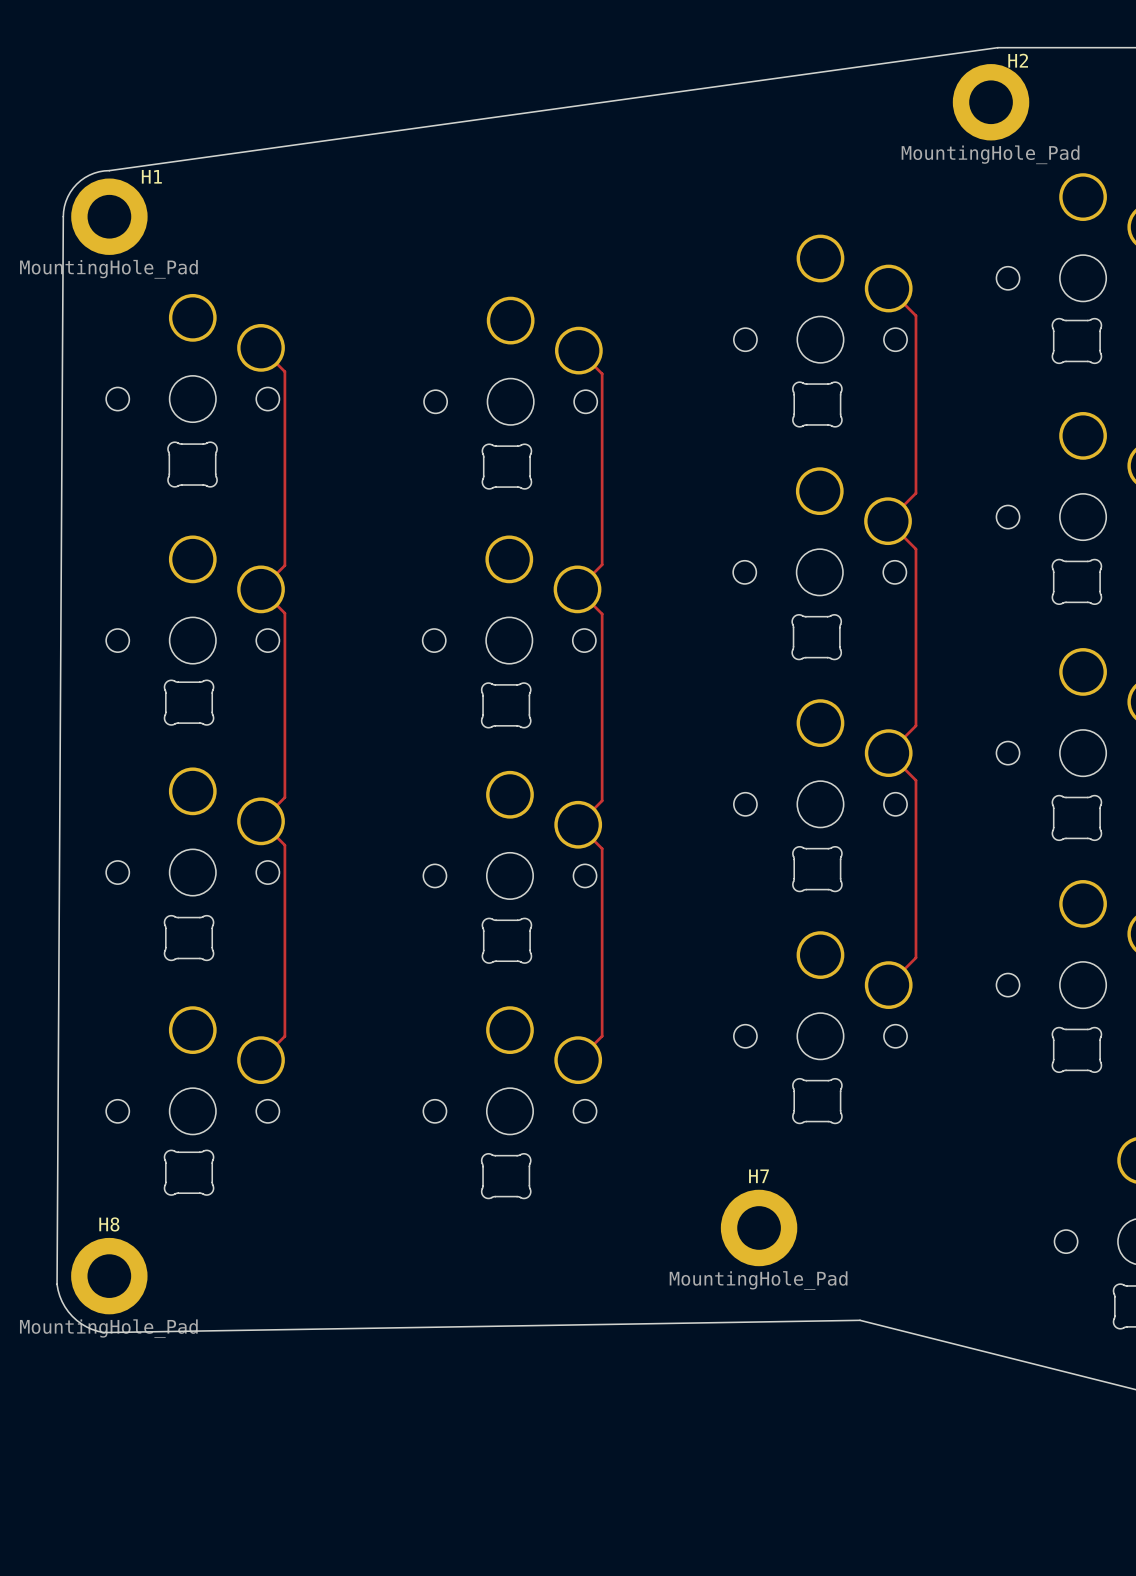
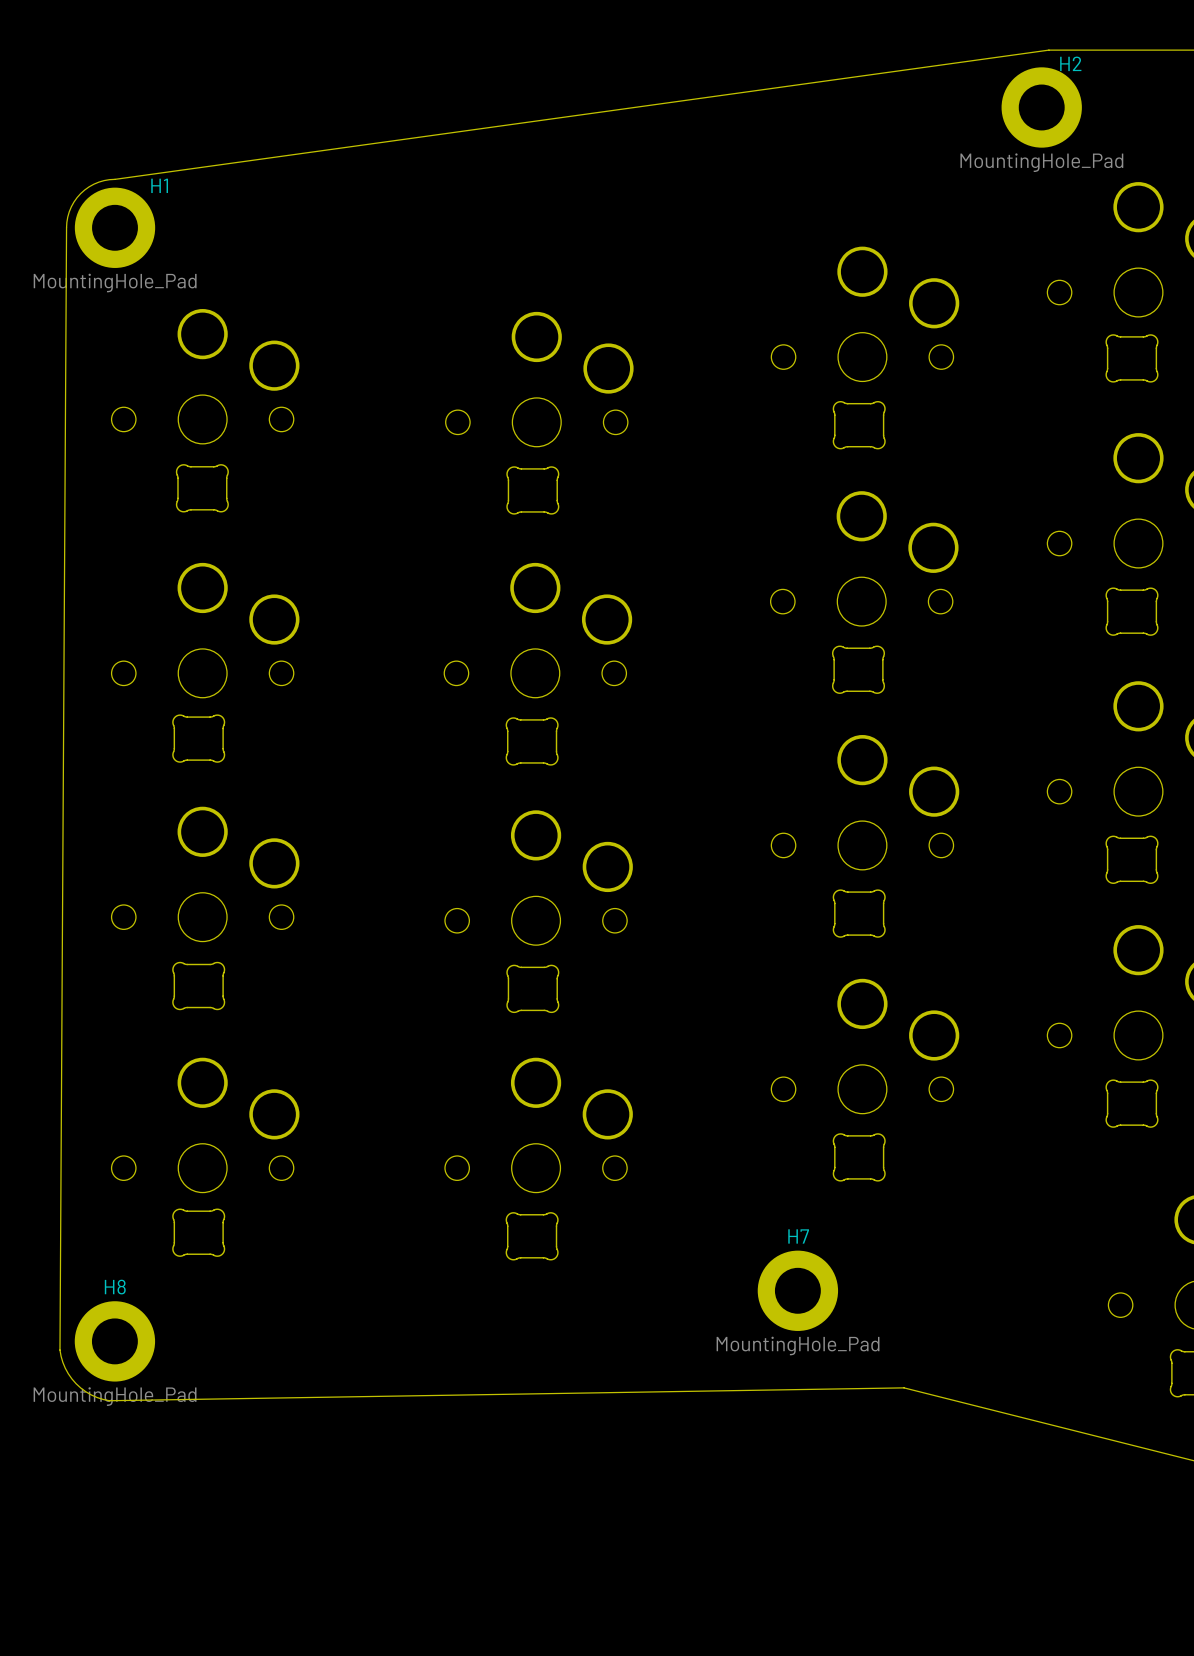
track: (888, 288) (915, 315) (915, 493) (888, 521) (915, 549) (915, 725) (888, 753) (915, 780) (915, 957) (888, 985) -> none
track: (261, 347) (284, 371) (284, 565) (261, 589) (284, 613) (284, 797) (261, 821) (284, 845) (284, 1036) (261, 1060) -> none
track: (578, 350) (602, 373) (602, 564) (577, 589) (602, 614) (602, 800) (578, 824) (602, 848) (602, 1036) (578, 1060) -> none

